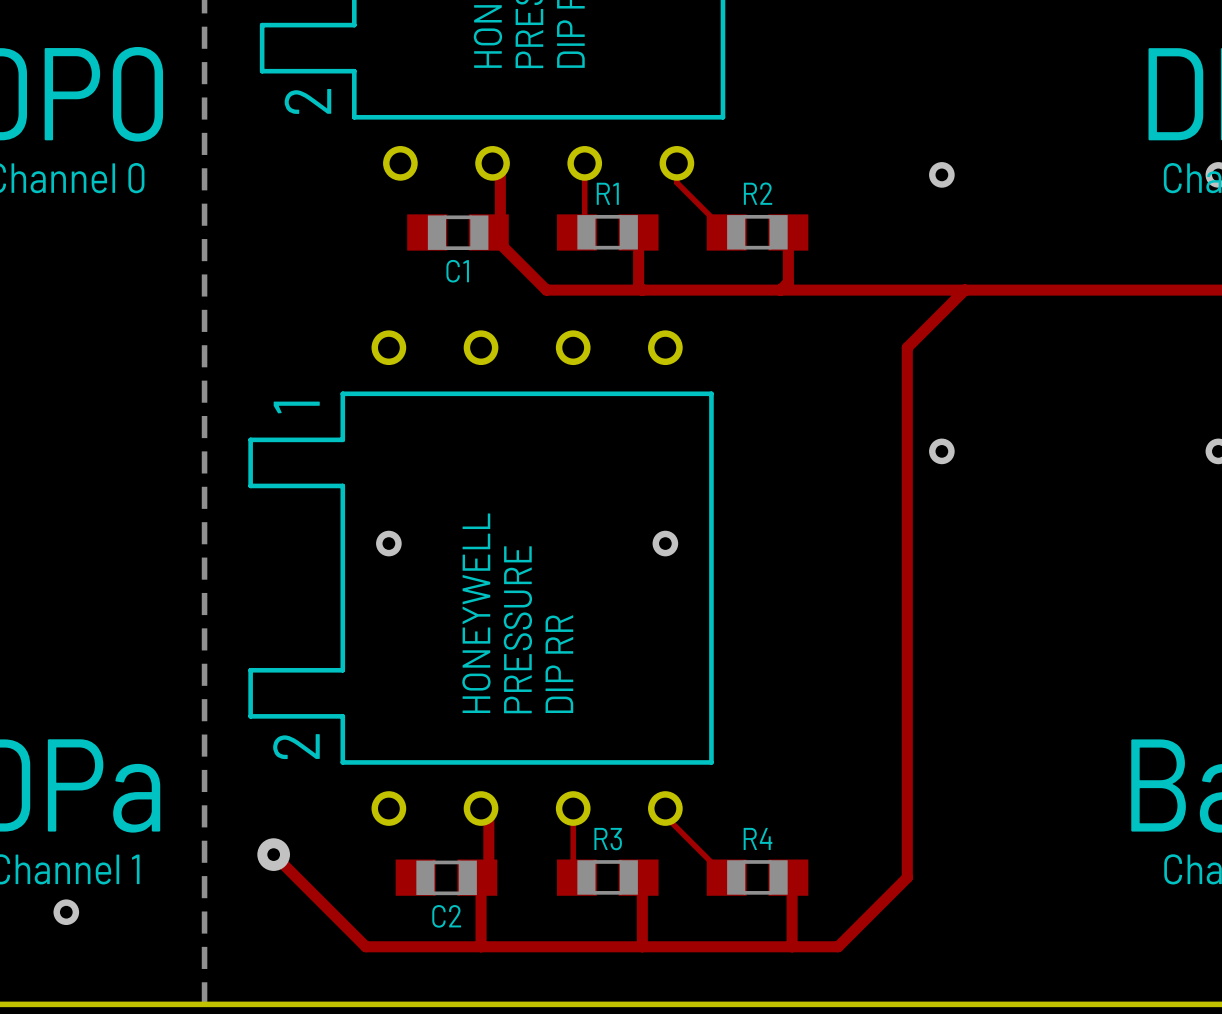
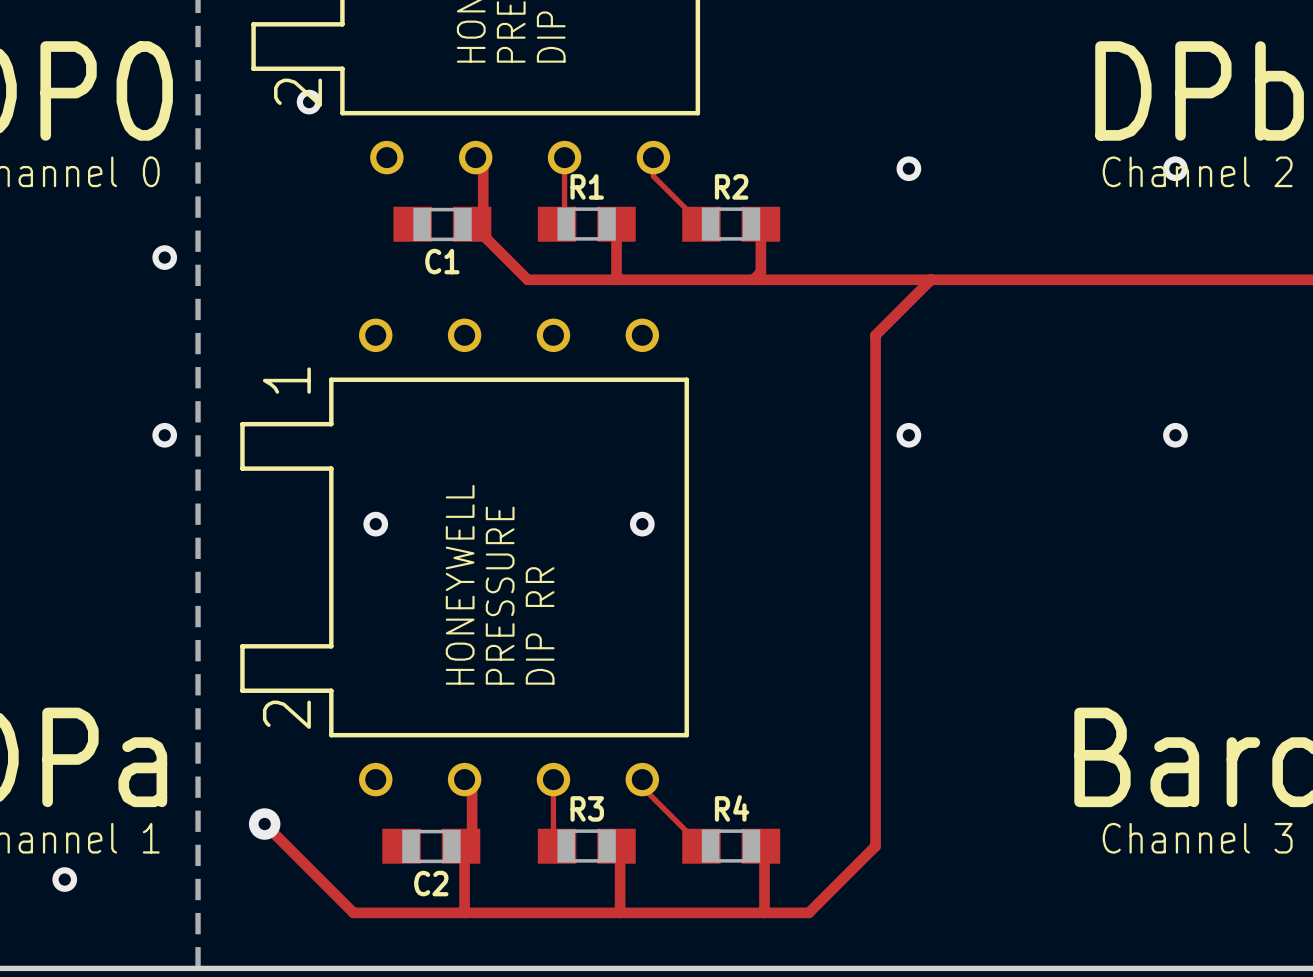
via: none -> (309, 102)
via: none -> (164, 257)
via: none -> (164, 435)

